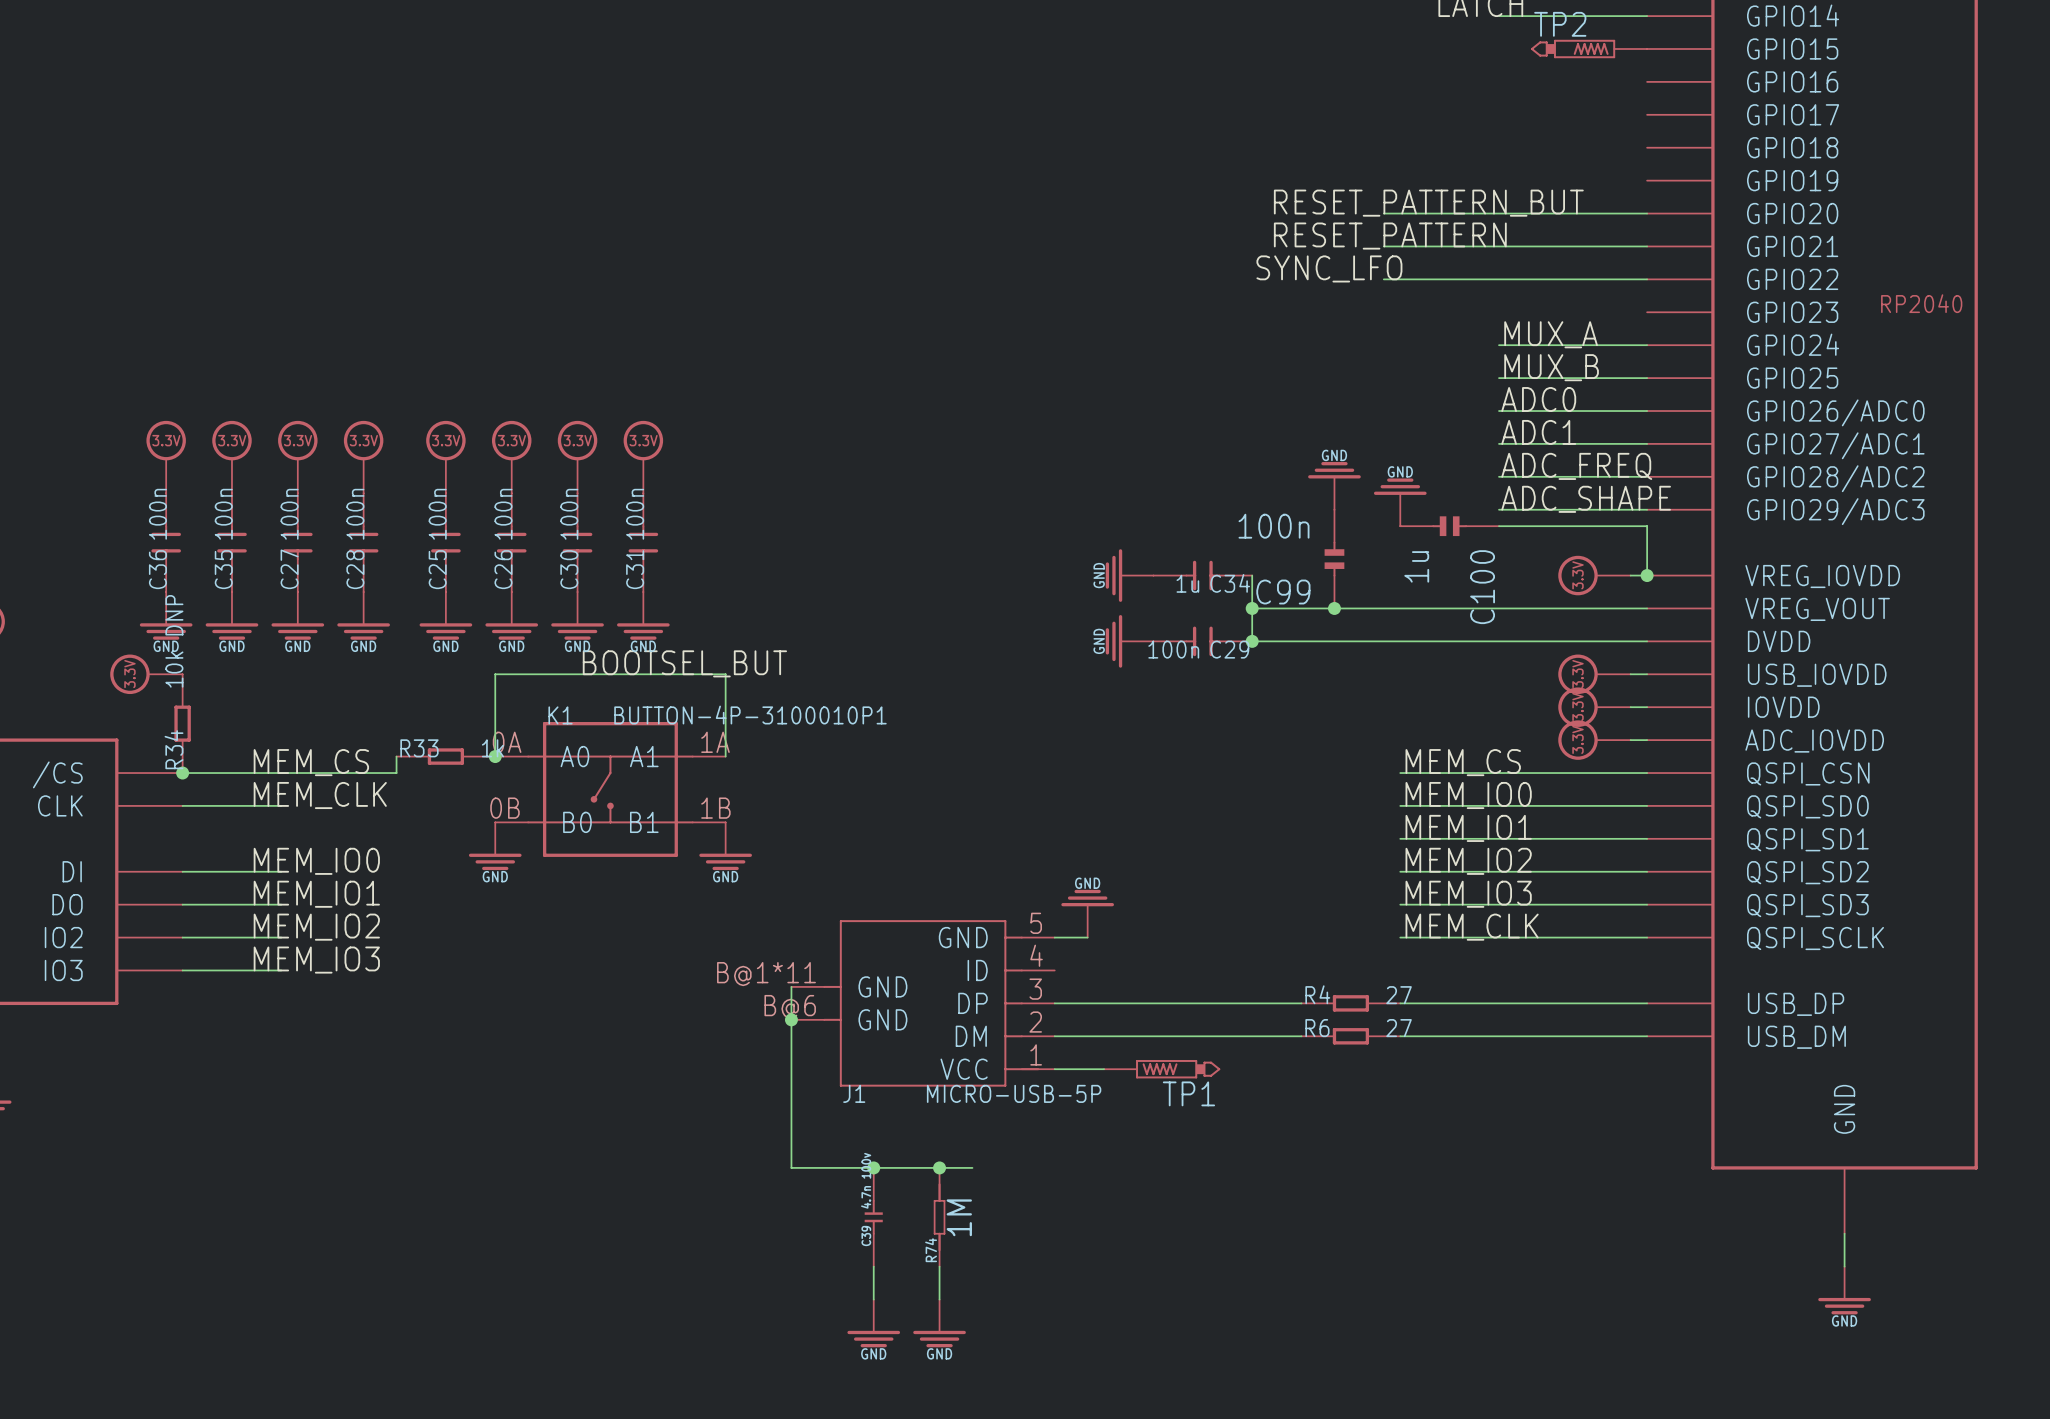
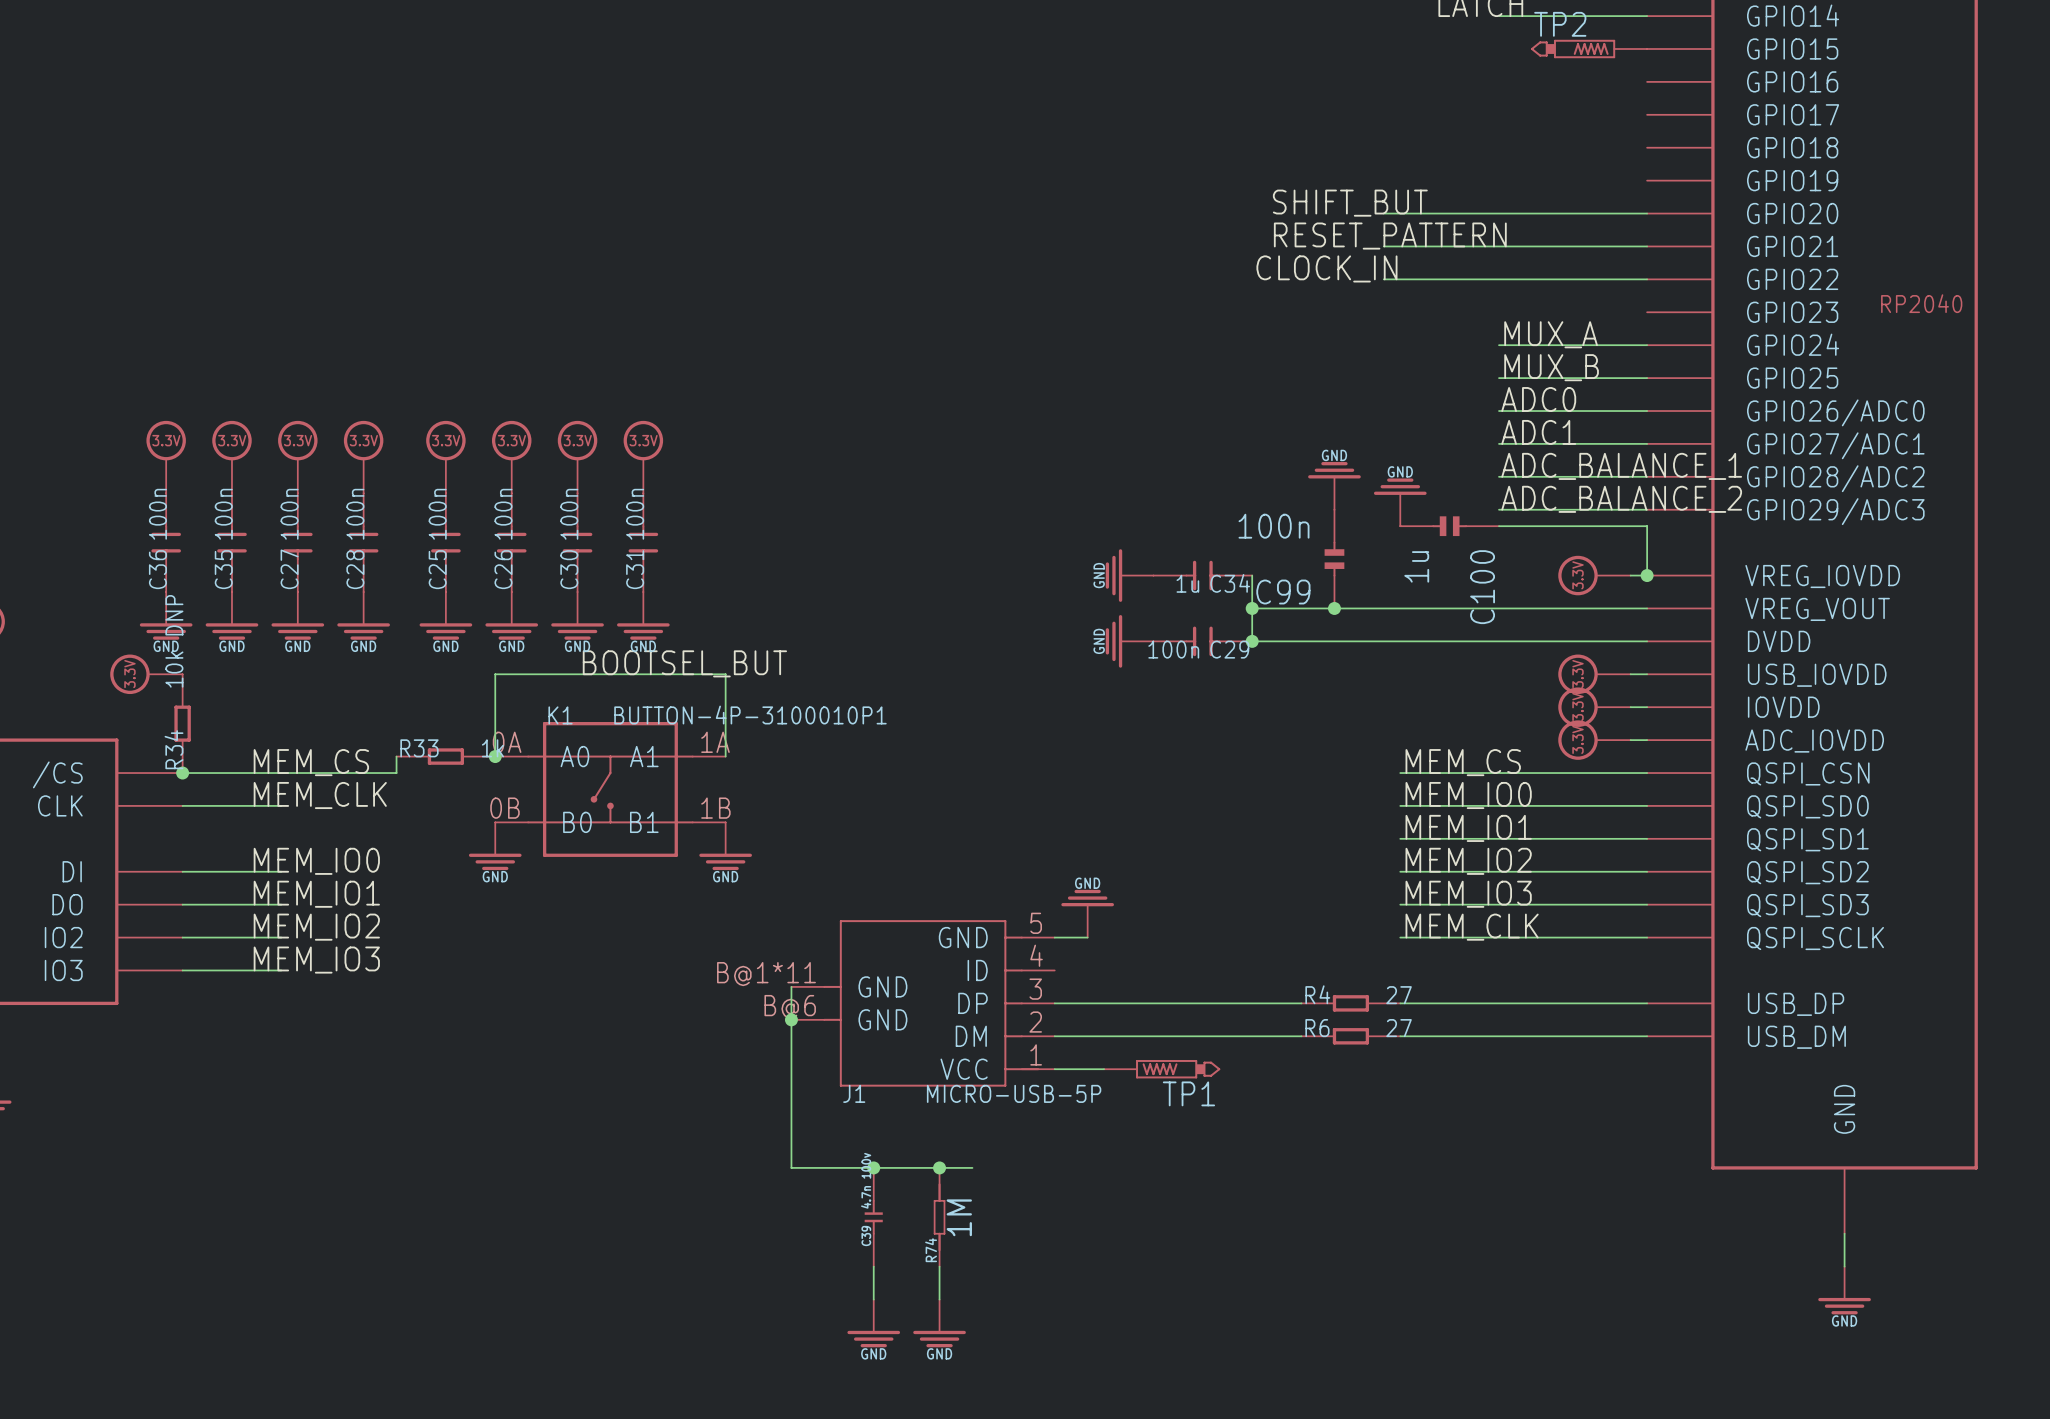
label: RESET_PATTERN_BUT (1428, 203) -> SHIFT_BUT (1350, 203)
label: SYNC_LFO (1329, 268) -> CLOCK_IN (1326, 268)
label: ADC_FREQ (1576, 466) -> ADC_BALANCE_1 (1621, 466)
label: ADC_SHAPE (1586, 499) -> ADC_BALANCE_2 (1621, 499)

